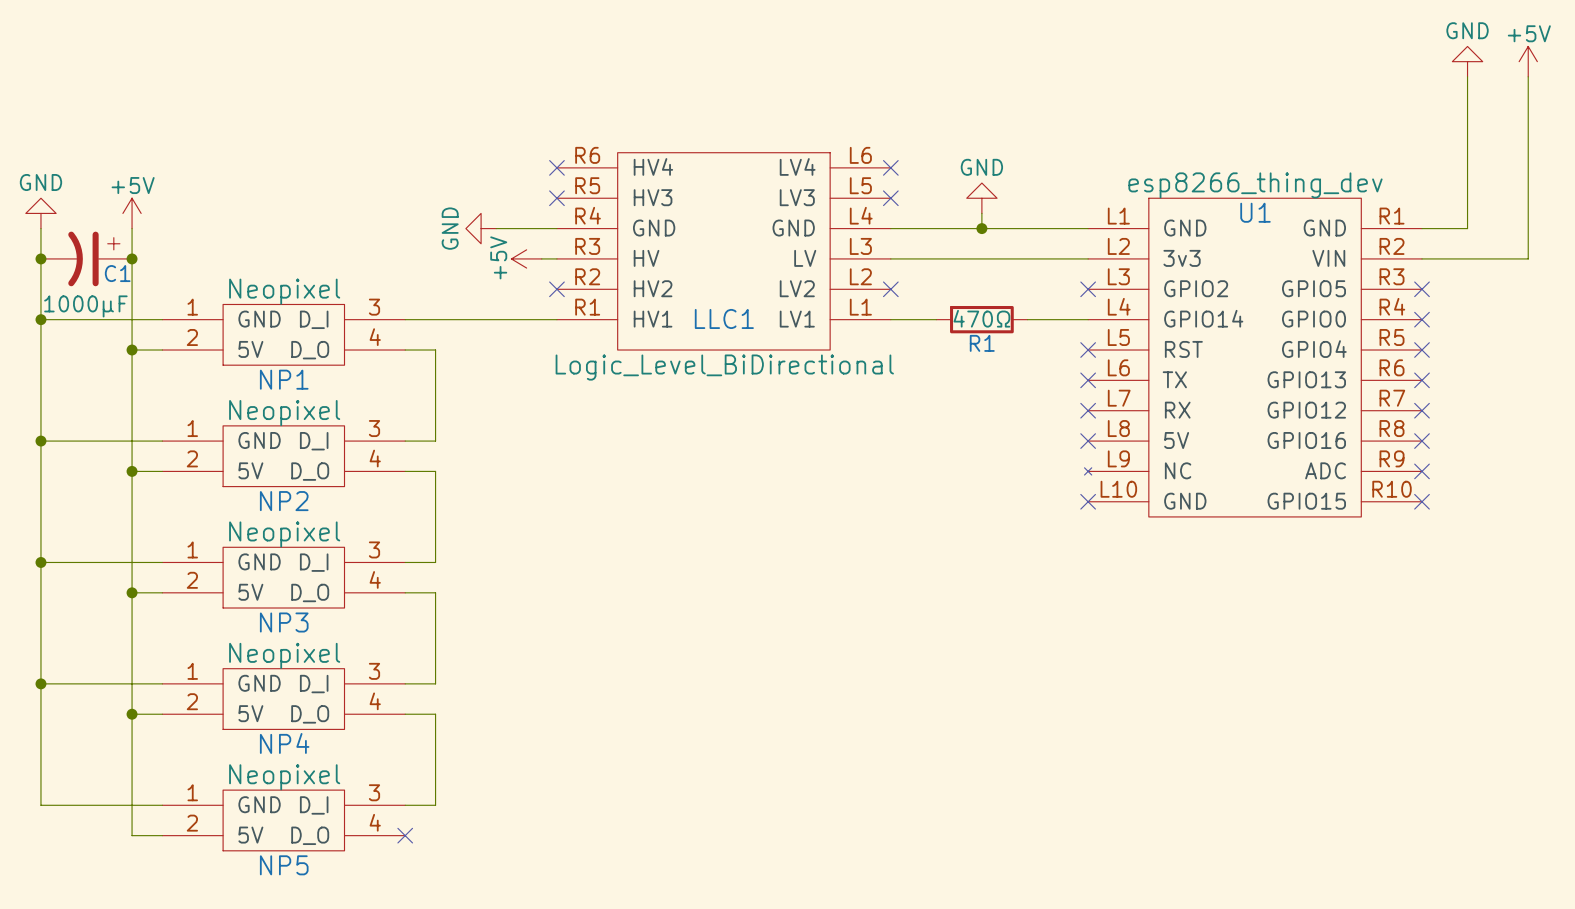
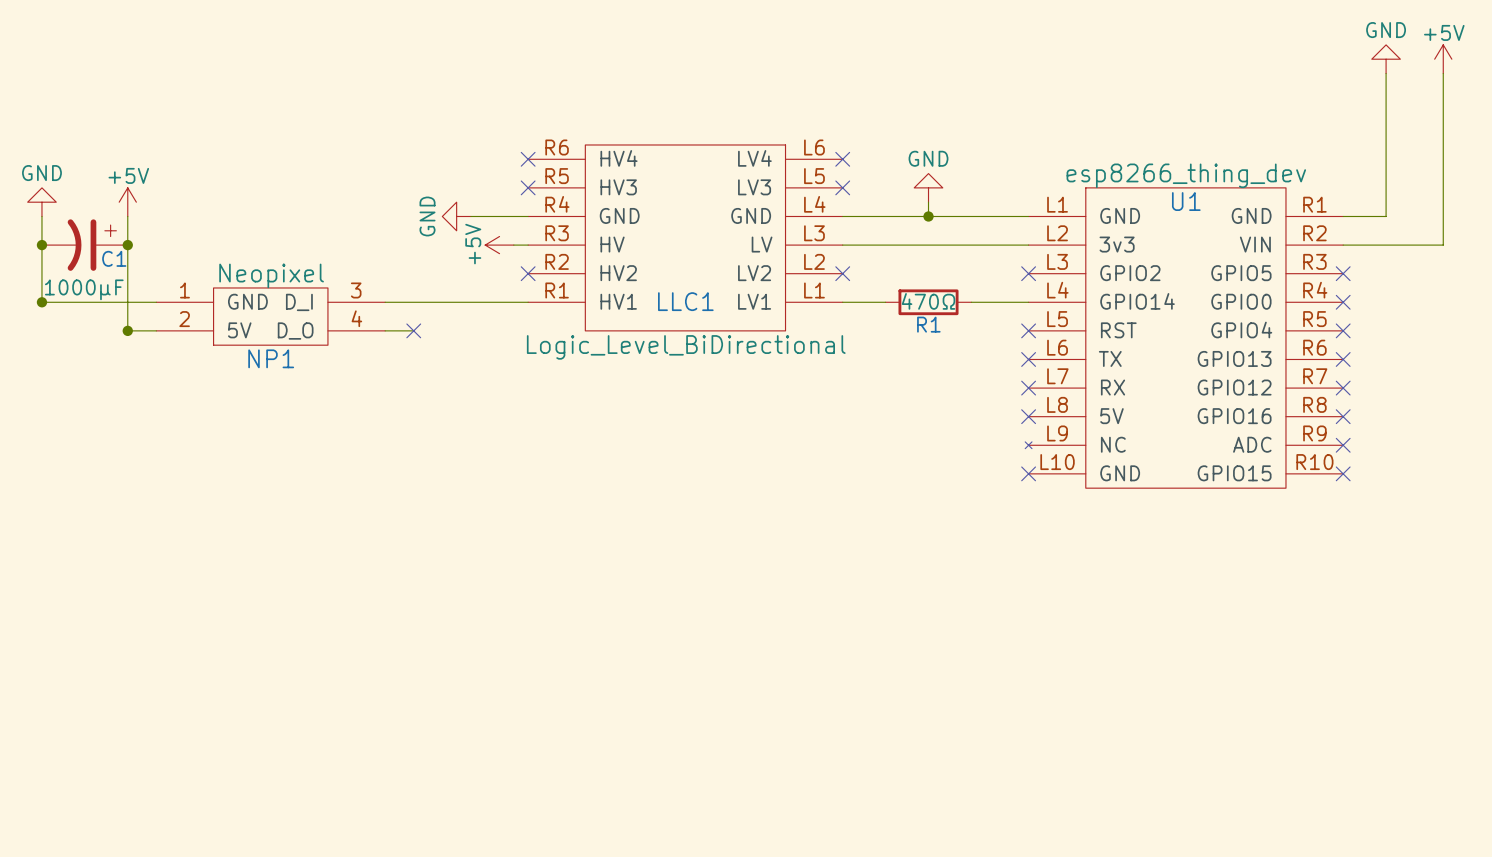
wire: (40, 319) (40, 805) (162, 805) -> none
wire: (132, 350) (132, 835) (162, 835) -> none
wire: (435, 350) (435, 441) (405, 441) -> none
no-connect mark: none -> (413, 330)
wire: (40, 441) (162, 441) -> none
junction: (40, 441) -> none
NP2: Neopixel (283, 456) -> none
wire: (132, 471) (162, 471) -> none
junction: (132, 471) -> none
wire: (405, 471) (435, 471) (435, 562) (405, 562) -> none
wire: (40, 562) (162, 562) -> none
junction: (40, 562) -> none
NP3: Neopixel (283, 577) -> none
wire: (132, 592) (162, 592) -> none
junction: (132, 592) -> none
wire: (405, 592) (435, 592) (435, 683) (405, 683) -> none
wire: (40, 683) (162, 683) -> none
junction: (40, 683) -> none
NP4: Neopixel (283, 699) -> none
wire: (132, 714) (162, 714) -> none
junction: (132, 714) -> none
wire: (405, 714) (435, 714) (435, 805) (405, 805) -> none
NP5: Neopixel (283, 820) -> none
no-connect mark: (405, 835) -> none

